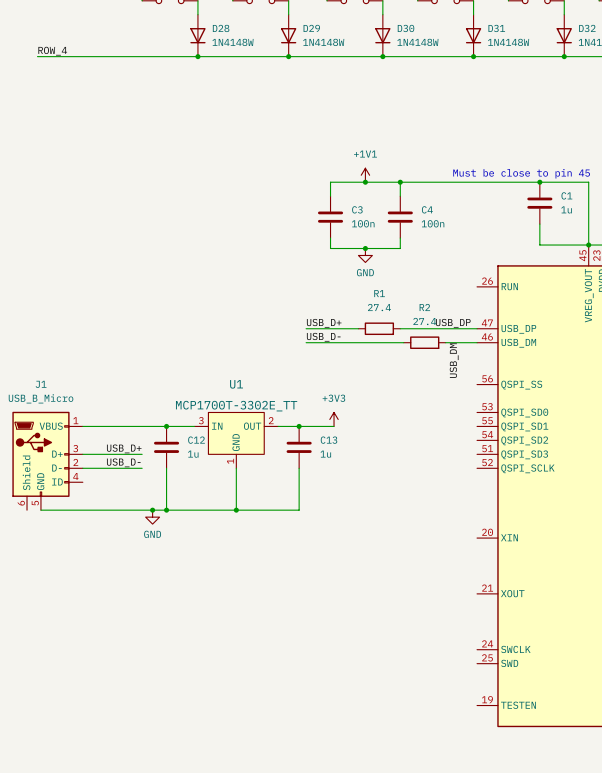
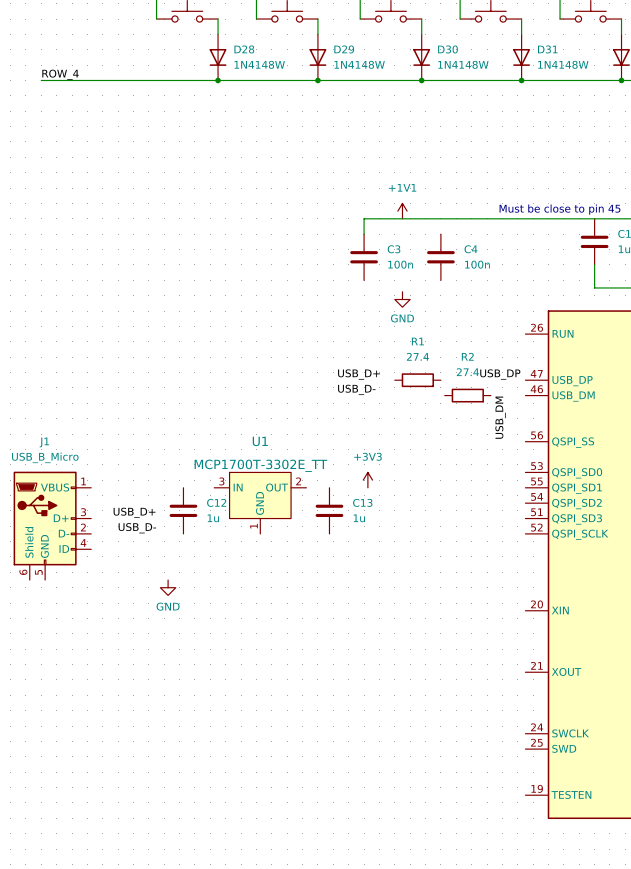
junction: (365, 182) -> none
wire: (400, 182) (400, 196) -> none
junction: (400, 182) -> none
junction: (539, 182) -> none
wire: (330, 238) (330, 248) (400, 248) (400, 238) -> none
junction: (365, 248) -> none
wire: (306, 328) (358, 328) -> none
wire: (400, 328) (477, 328) -> none
wire: (306, 342) (403, 342) -> none
wire: (445, 342) (477, 342) -> none
wire: (82, 426) (194, 426) -> none
junction: (166, 426) -> none
wire: (278, 426) (334, 426) -> none
junction: (299, 426) -> none
wire: (82, 454) (142, 454) -> none
wire: (82, 468) (142, 468) -> none
wire: (166, 468) (166, 510) -> none
wire: (236, 468) (236, 510) -> none
wire: (299, 468) (299, 510) (40, 510) -> none
junction: (152, 510) -> none
junction: (166, 510) -> none
junction: (236, 510) -> none

